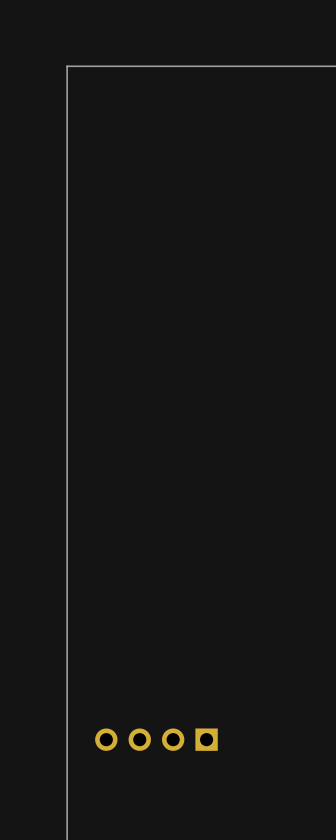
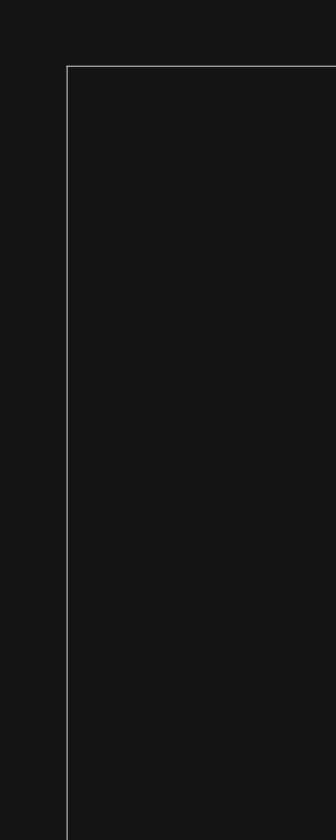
part: (156, 739) -> none

